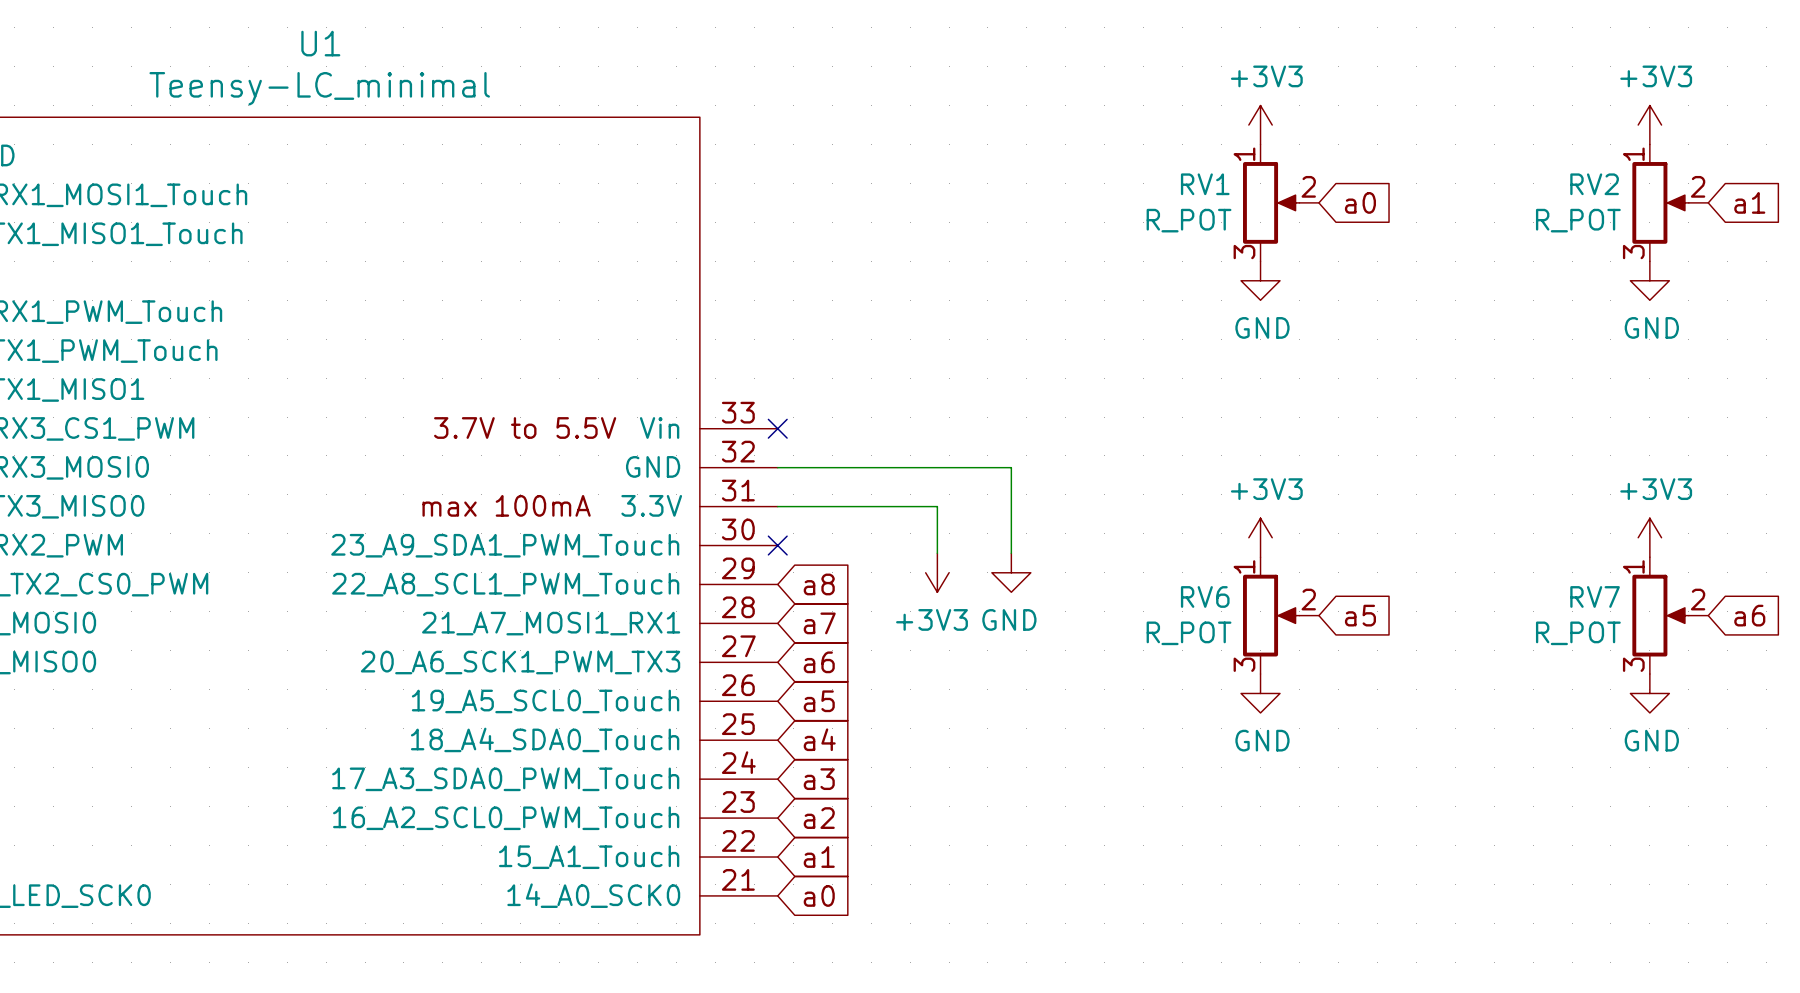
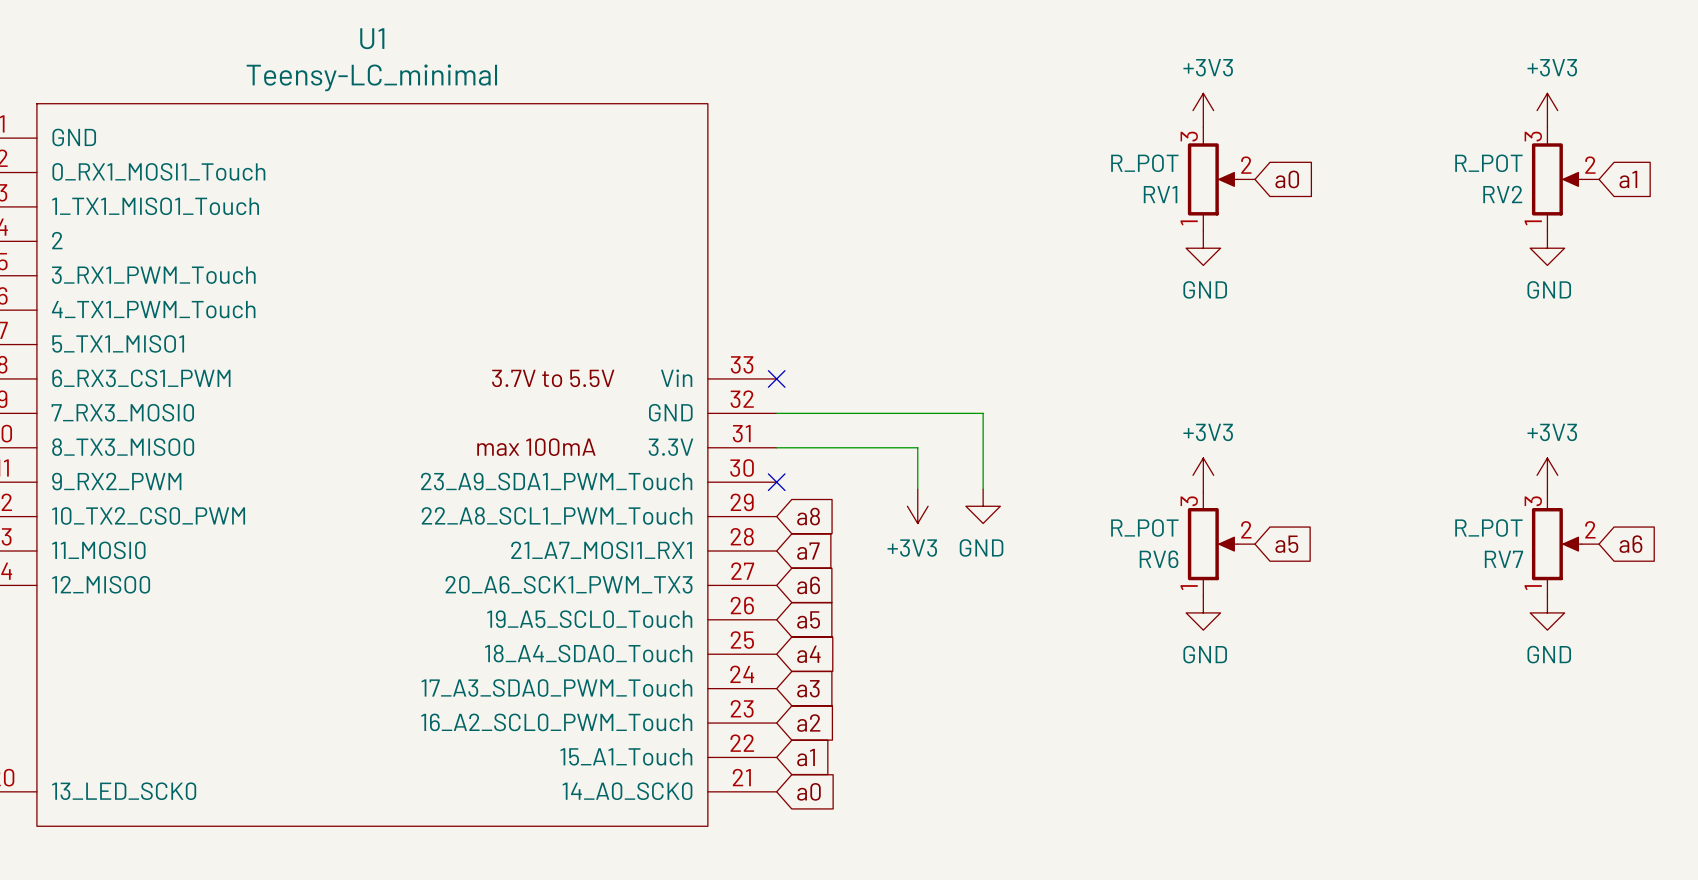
RV1 flip: as is (1271, 202) -> up-down (1212, 179)
RV2 flip: as is (1660, 202) -> up-down (1556, 179)
RV6 flip: as is (1271, 615) -> up-down (1212, 544)
RV7 flip: as is (1660, 615) -> up-down (1556, 544)

